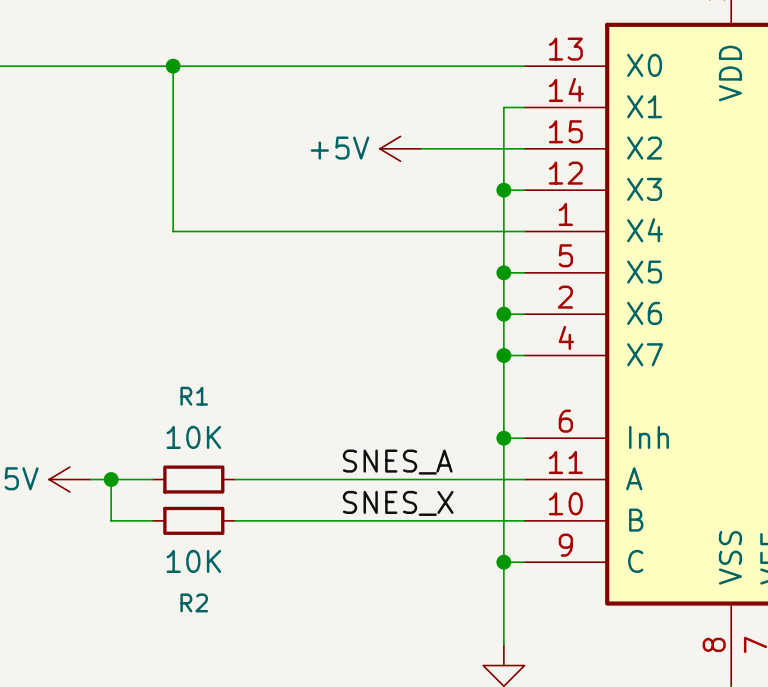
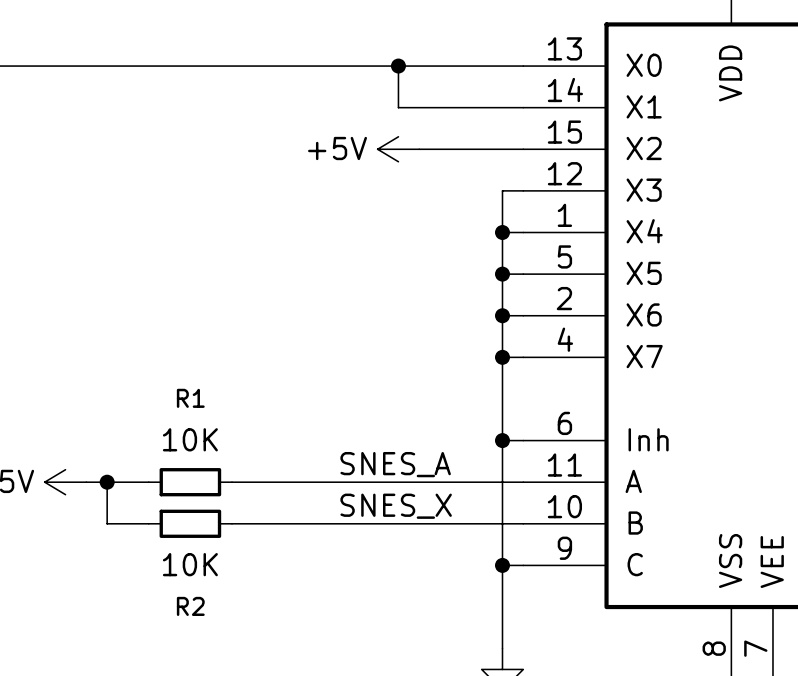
wire: (173, 66) (173, 231) (503, 231) -> none
junction: (173, 66) -> none
junction: none -> (398, 66)
wire: (503, 107) (503, 190) -> (502, 107) (398, 107) (398, 66)
junction position: (503, 190) -> (502, 232)

